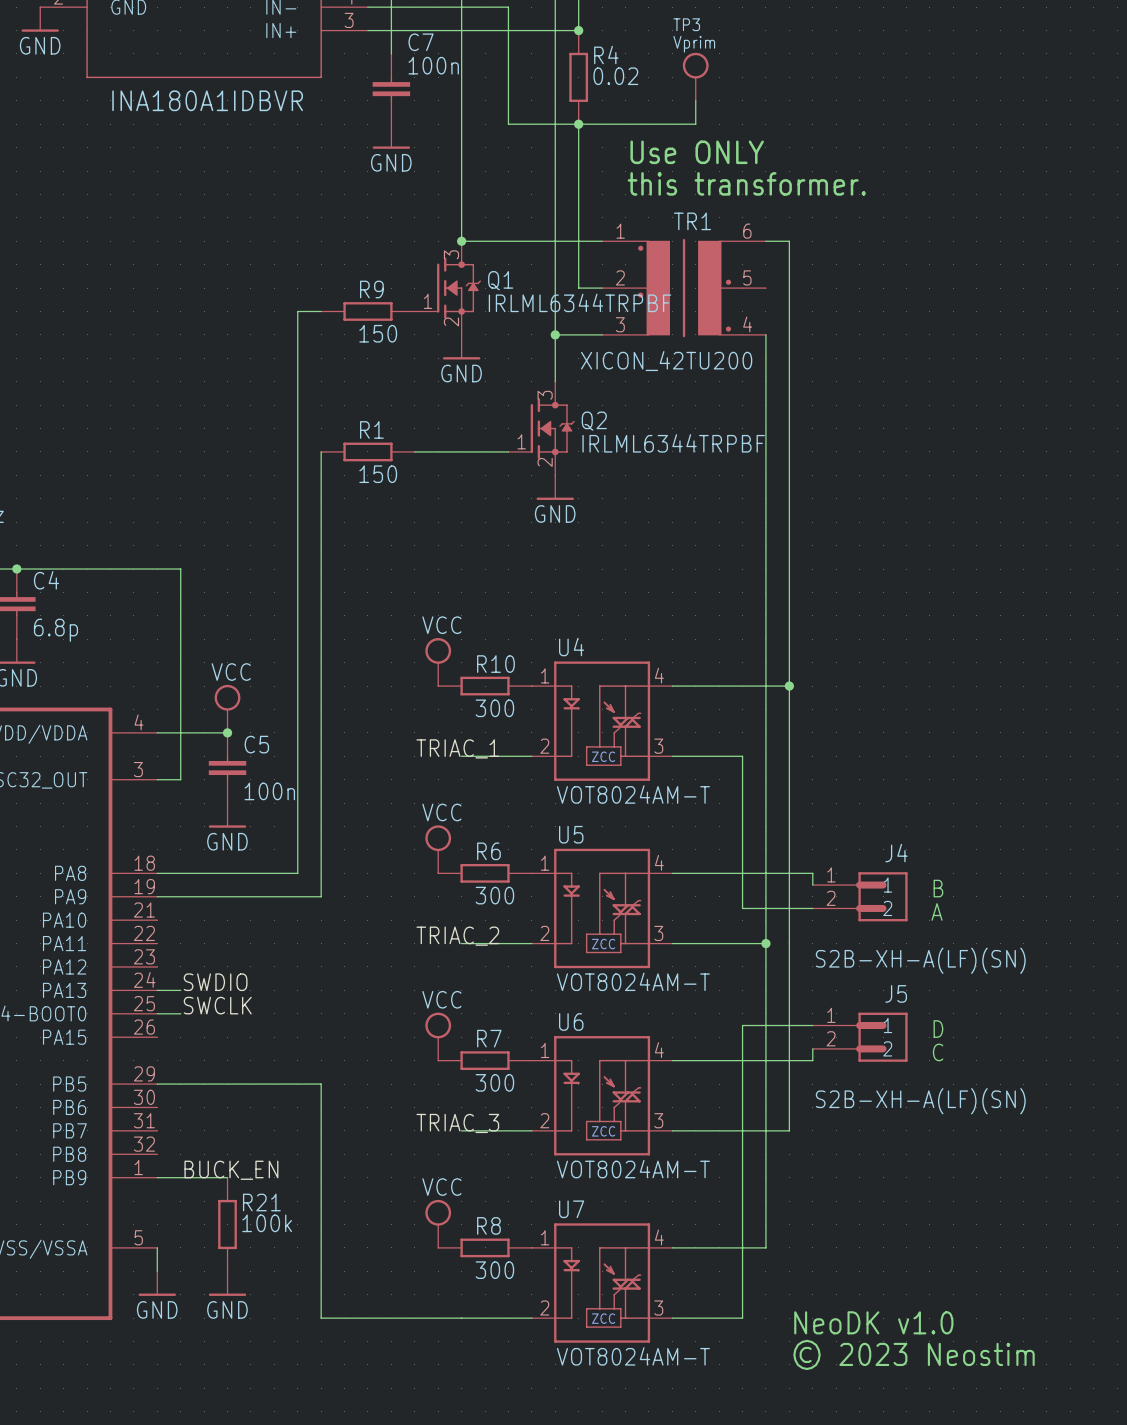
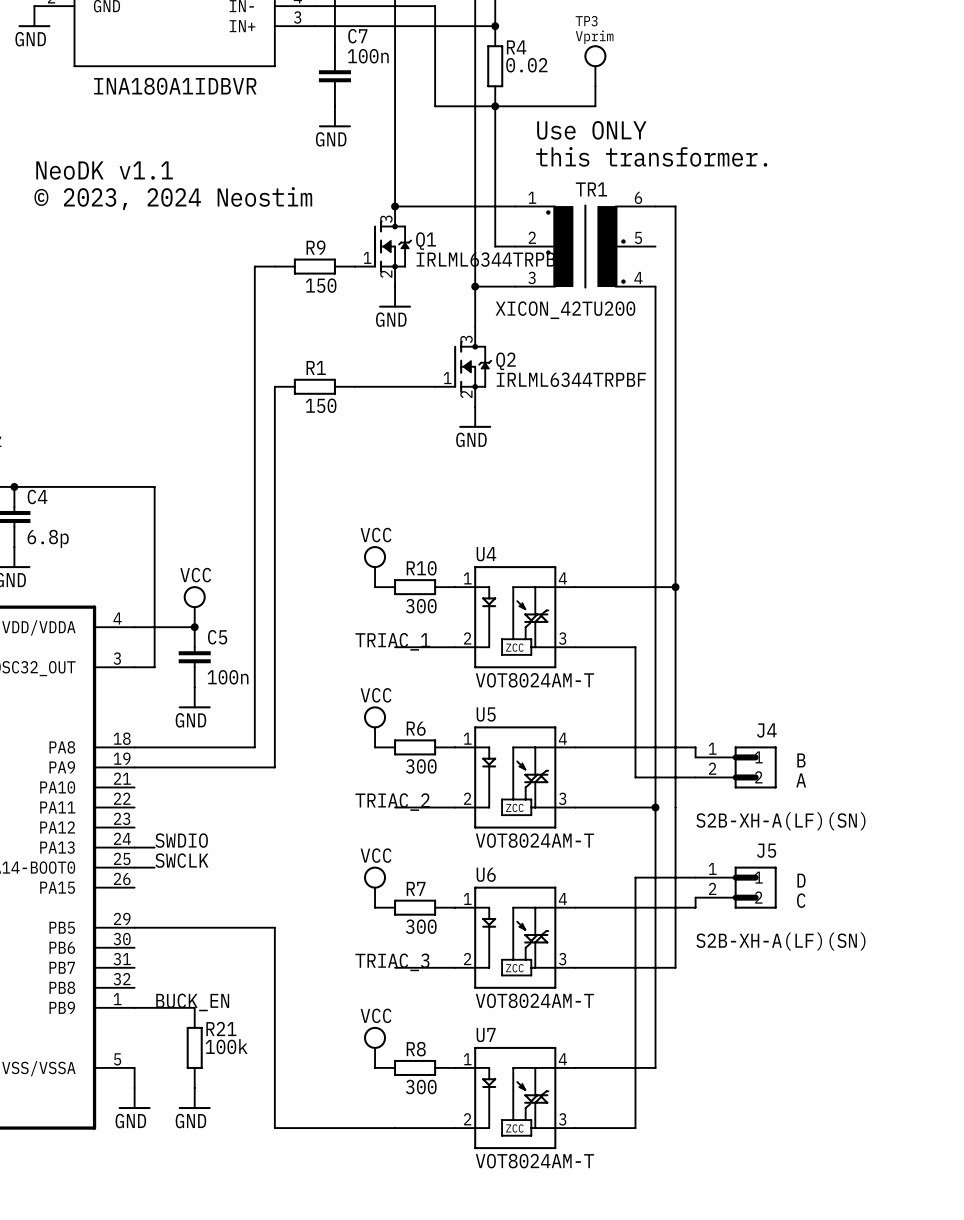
text: none -> NeoDK v1.1 (104, 170)
text: none -> © 2023, 2024 Neostim (173, 198)
text: NeoDK v1.0 (873, 1322) -> none
text: © 2023 Neostim (914, 1354) -> none

